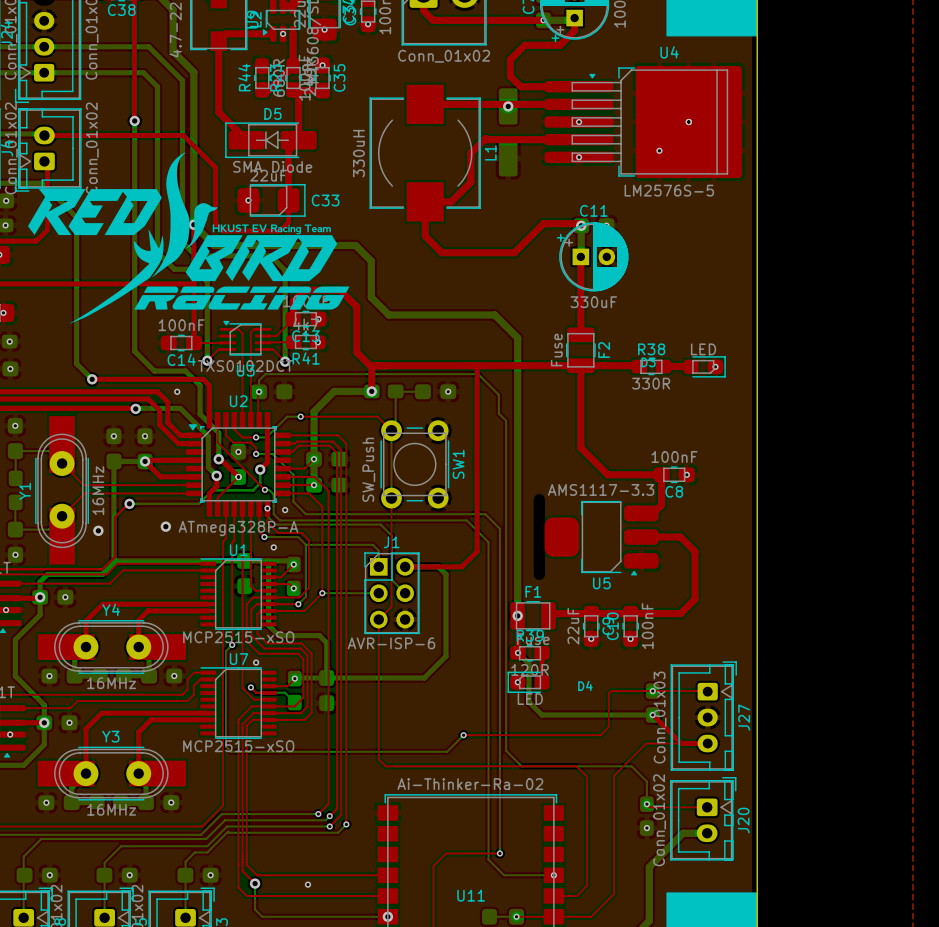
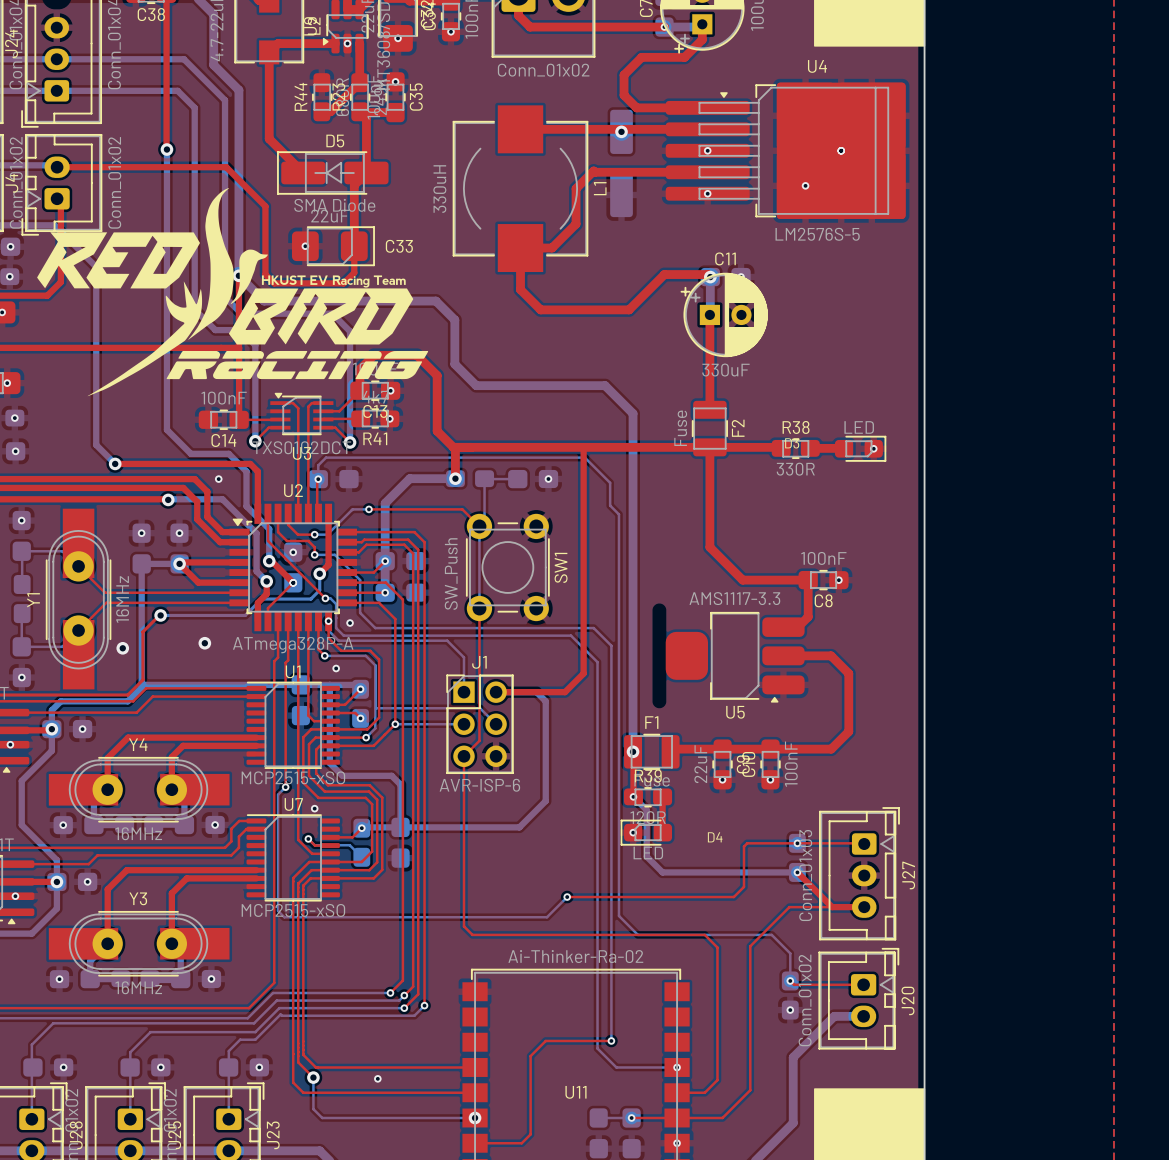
bottom track: (365, 524) (380, 524) (392, 535) (392, 580) -> (447, 640) (463, 657) (463, 672)
bottom track: (305, 544) (372, 544) (378, 550) -> none
bottom track: none -> (375, 708) (480, 708)

